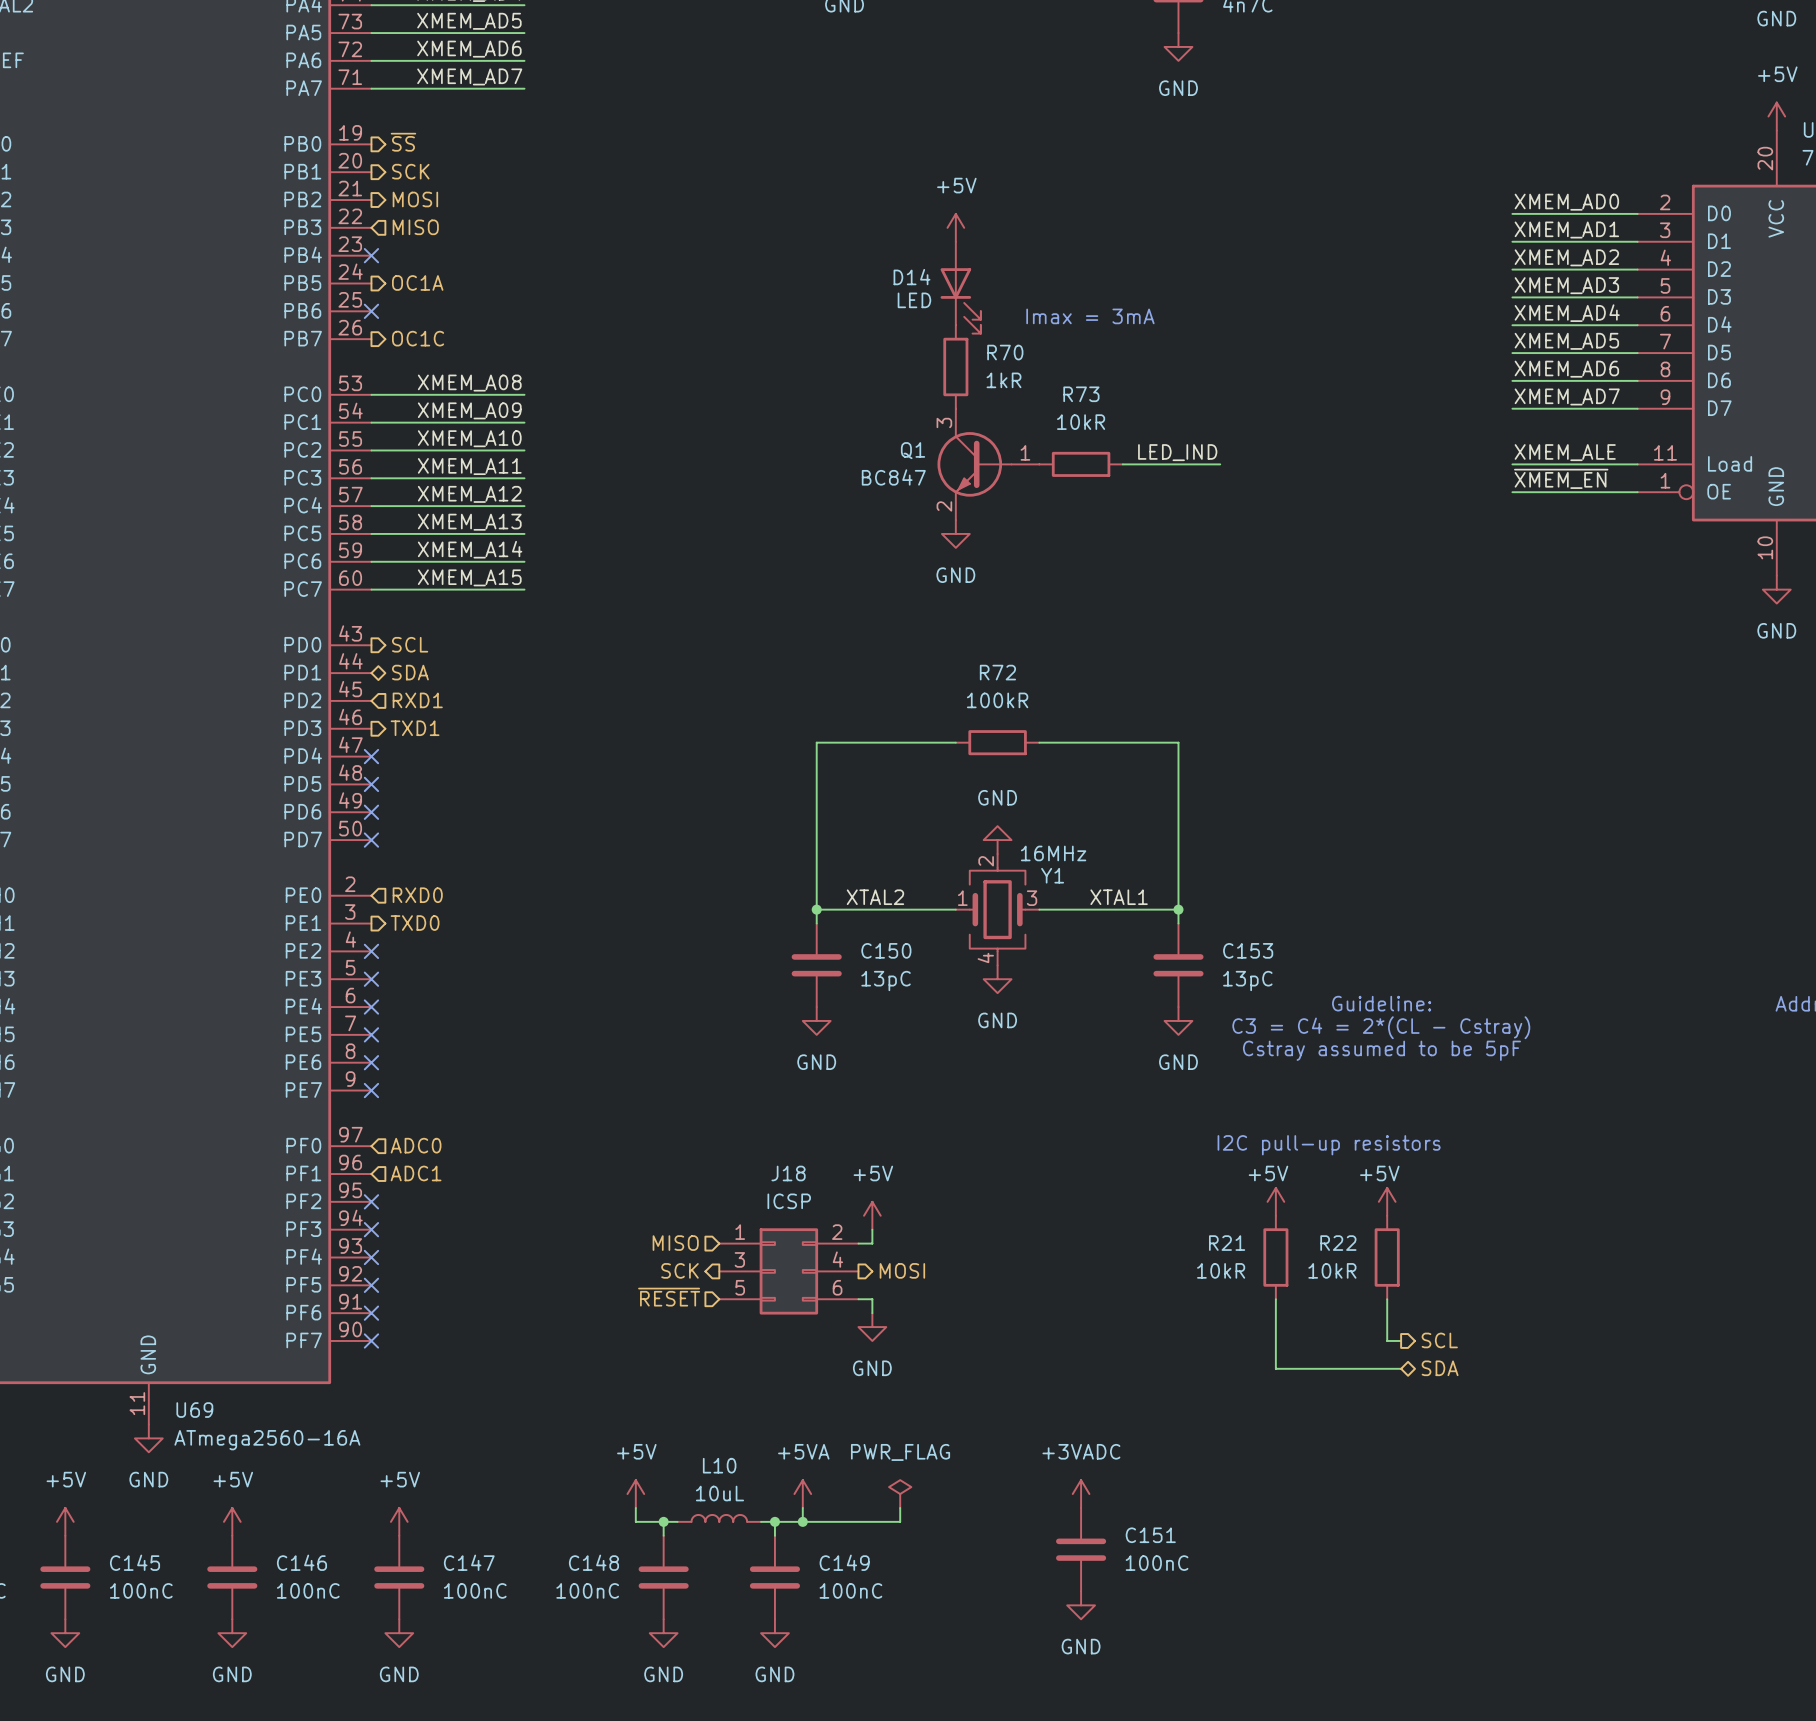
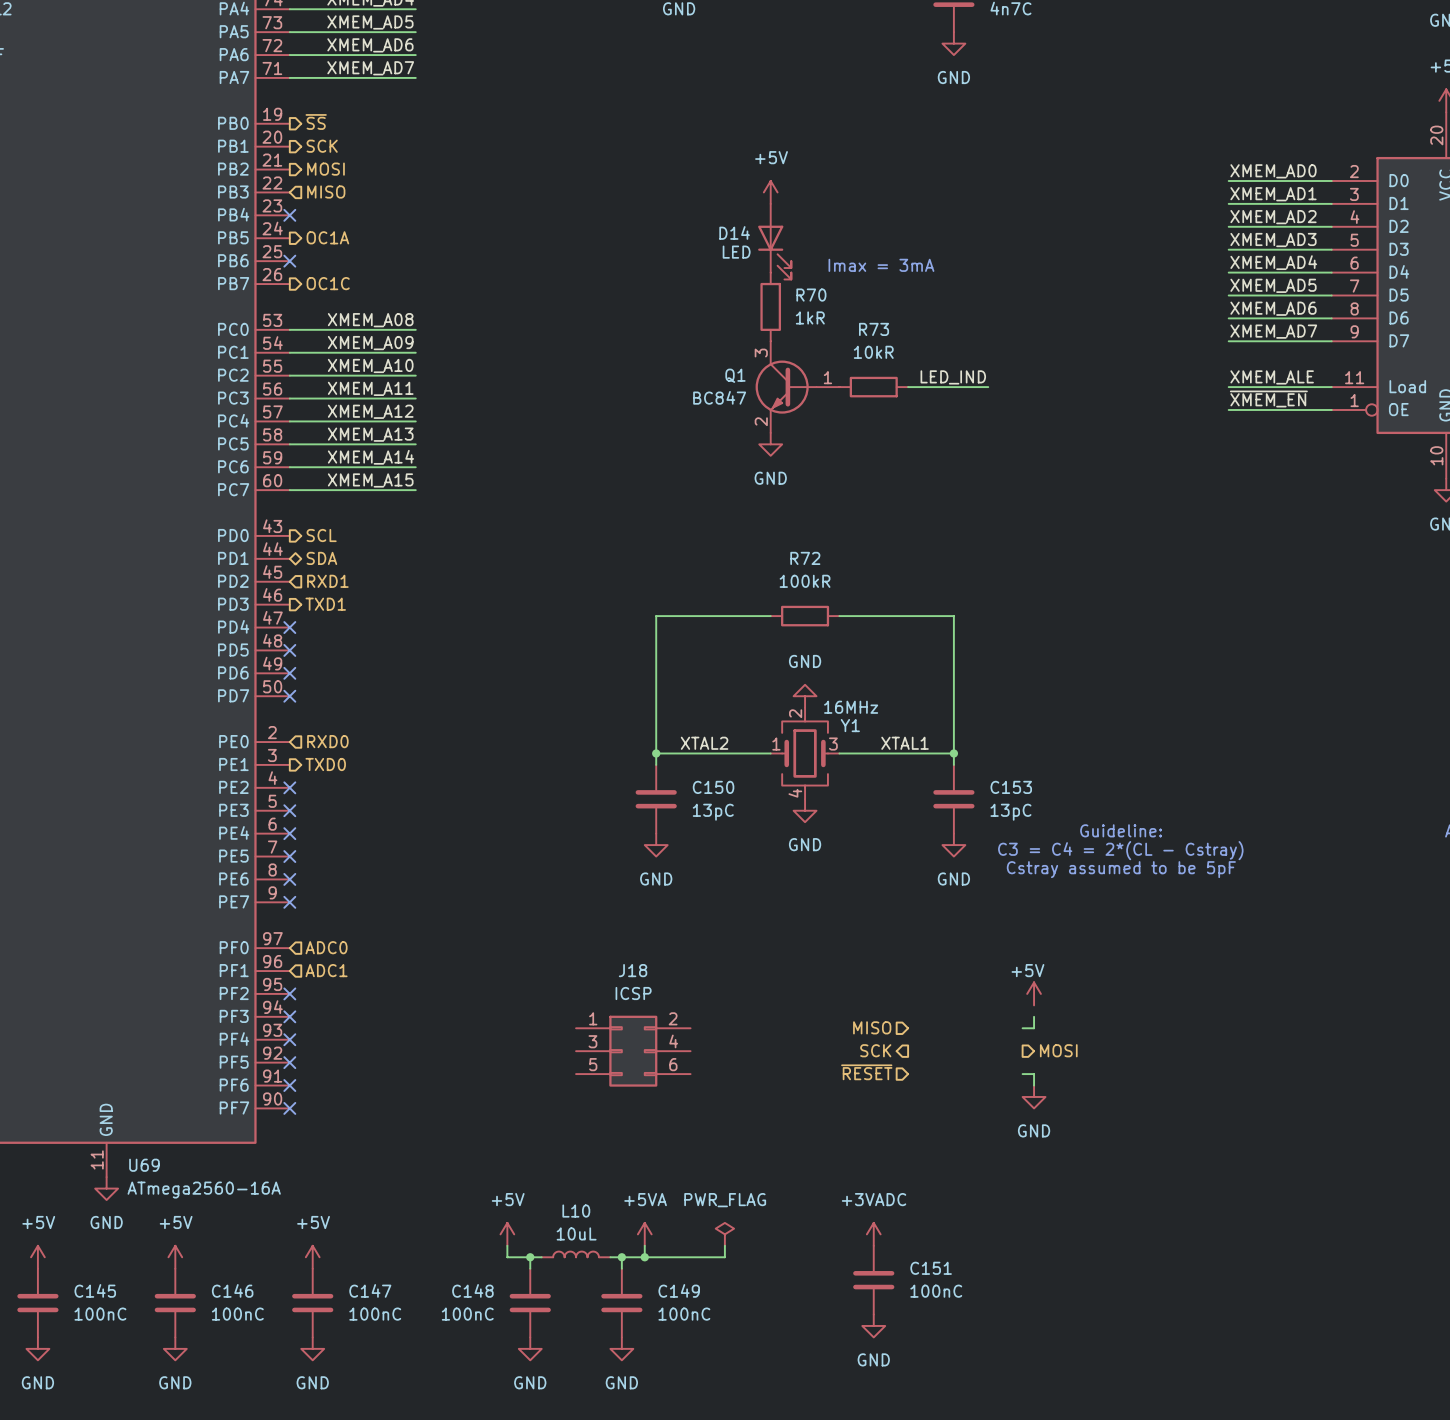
text: I2C pull-up resistors (1329, 1145) -> none
power symbol: +5V (1387, 1201) -> none
power symbol: +5V (872, 1215) -> none
wire: (872, 1229) (872, 1243) (858, 1243) -> none
wire: none -> (1034, 1016) (1034, 1028) (1022, 1028)
hierarchical label: MISO (675, 1243) -> none
hierarchical label: none -> MISO (872, 1027)
R21: 10kR (1275, 1257) -> none
R22: 10kR (1387, 1257) -> none
hierarchical label: SCK (680, 1270) -> none
hierarchical label: MOSI (902, 1270) -> none
hierarchical label: none -> SCK (875, 1050)
hierarchical label: none -> MOSI (1058, 1050)
hierarchical label: ~{RESET} (669, 1297) -> none
hierarchical label: none -> ~{RESET} (866, 1072)
wire: (858, 1299) (872, 1299) (872, 1313) -> none
wire: none -> (1022, 1074) (1034, 1074)
wire: (1387, 1299) (1387, 1340) (1401, 1340) -> none
wire: (1275, 1313) (1275, 1368) (1401, 1368) -> none
power symbol: GND (872, 1327) -> none
power symbol: none -> GND (1034, 1096)
hierarchical label: SCL (1439, 1340) -> none
hierarchical label: SDA (1440, 1368) -> none

